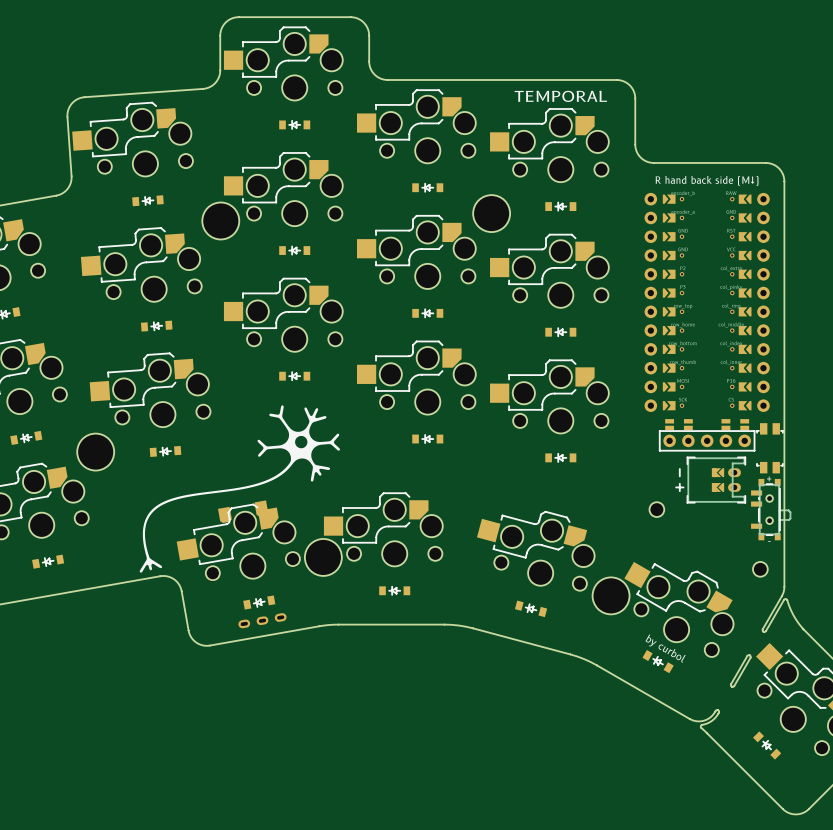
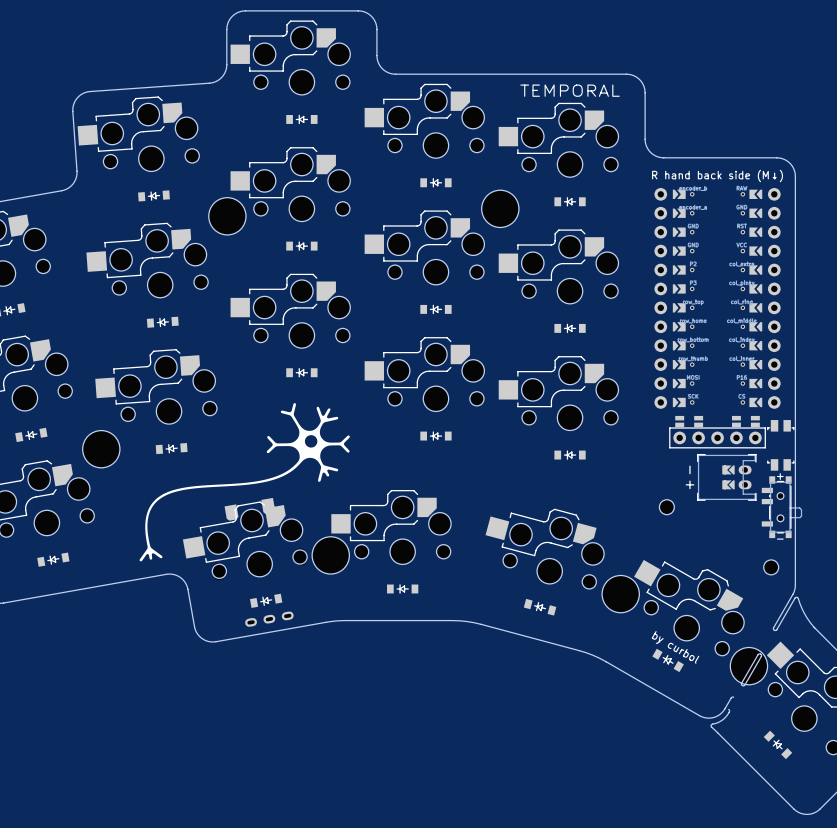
drawing shape: [139, 405, 340, 573] -> [139, 403, 350, 562]
board edge: (188, 628) (194, 641) (207, 645) (328, 625) (458, 625) (584, 659) (694, 720) (706, 720) (718, 710) -> (194, 626) (202, 638) (213, 641) (335, 621) (466, 621) (593, 655) (703, 717) (713, 717) (720, 714) (731, 697) (733, 697)
part: none -> (748, 666)

